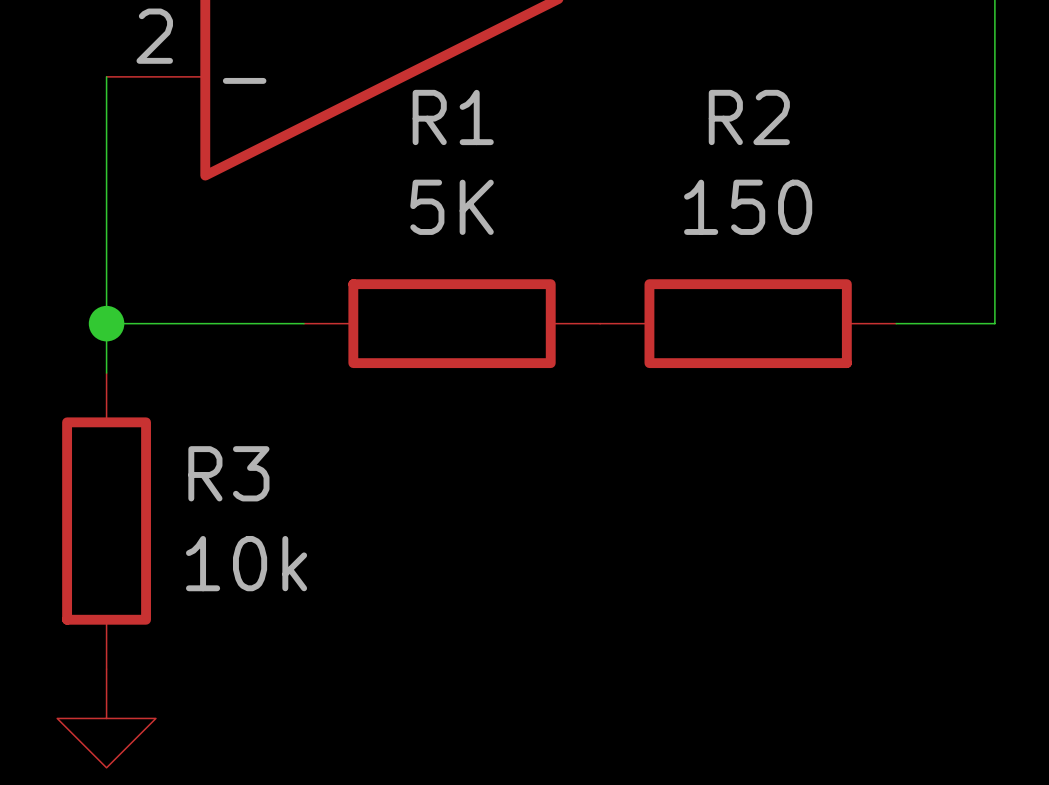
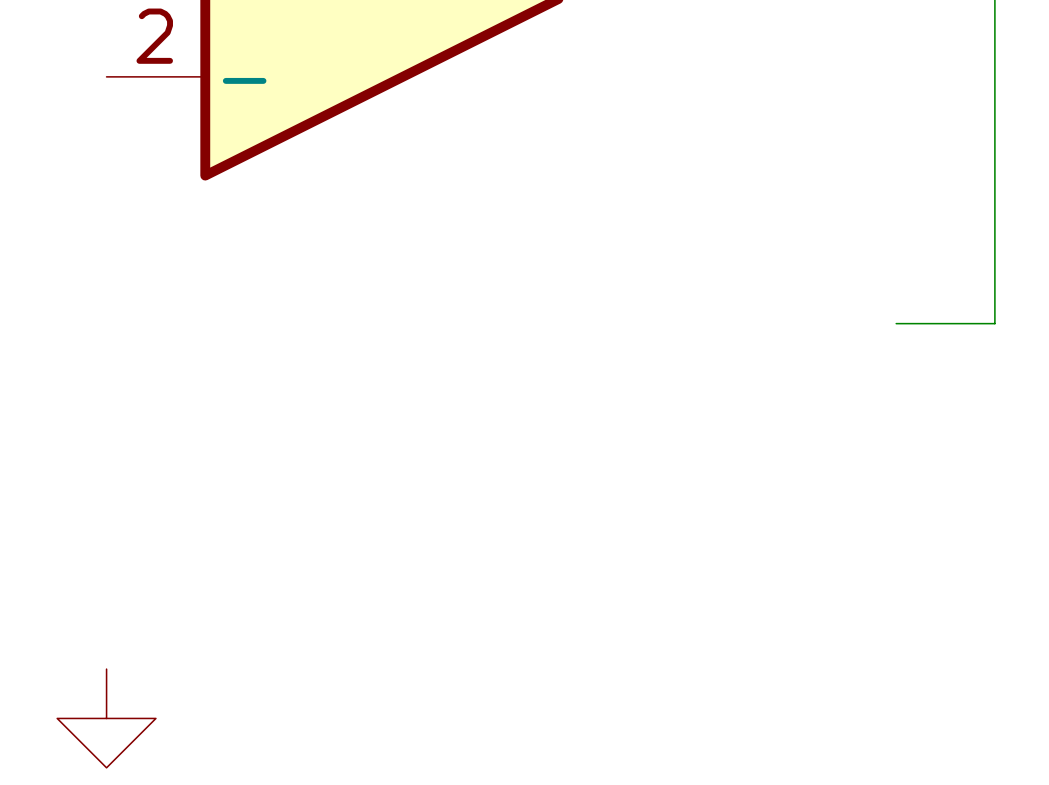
wire: (106, 76) (106, 372) -> none
wire: (106, 323) (303, 323) -> none
junction: (106, 323) -> none
R1: 5K (452, 323) -> none
R2: 150 (748, 323) -> none
R3: 10k (106, 521) -> none

